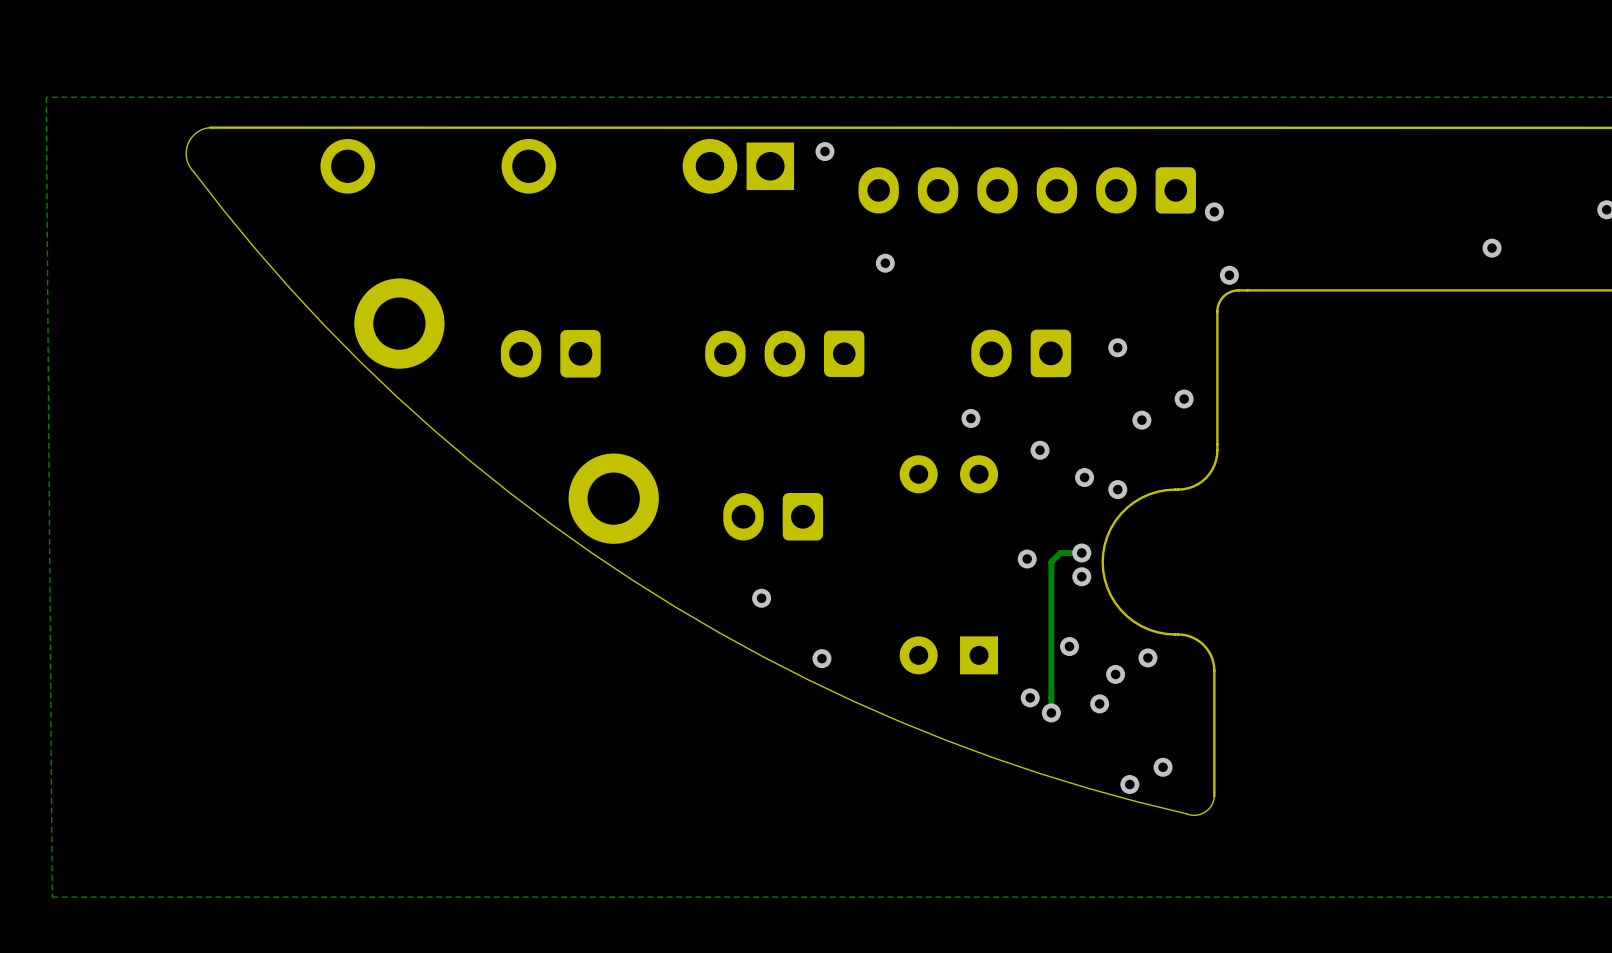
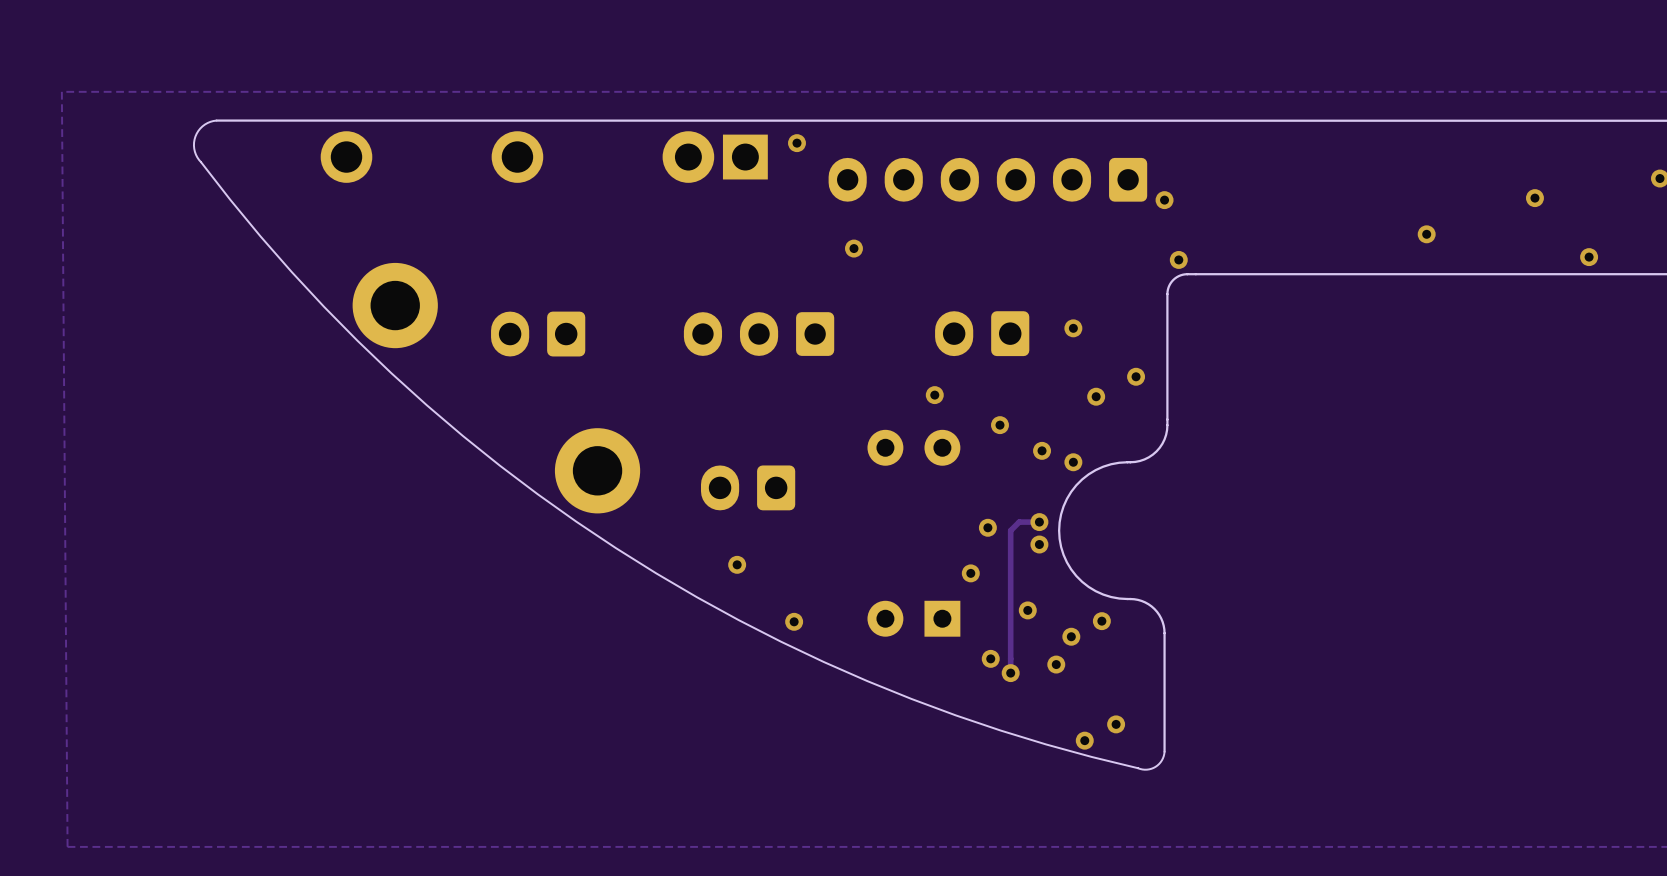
via: none -> (970, 573)

